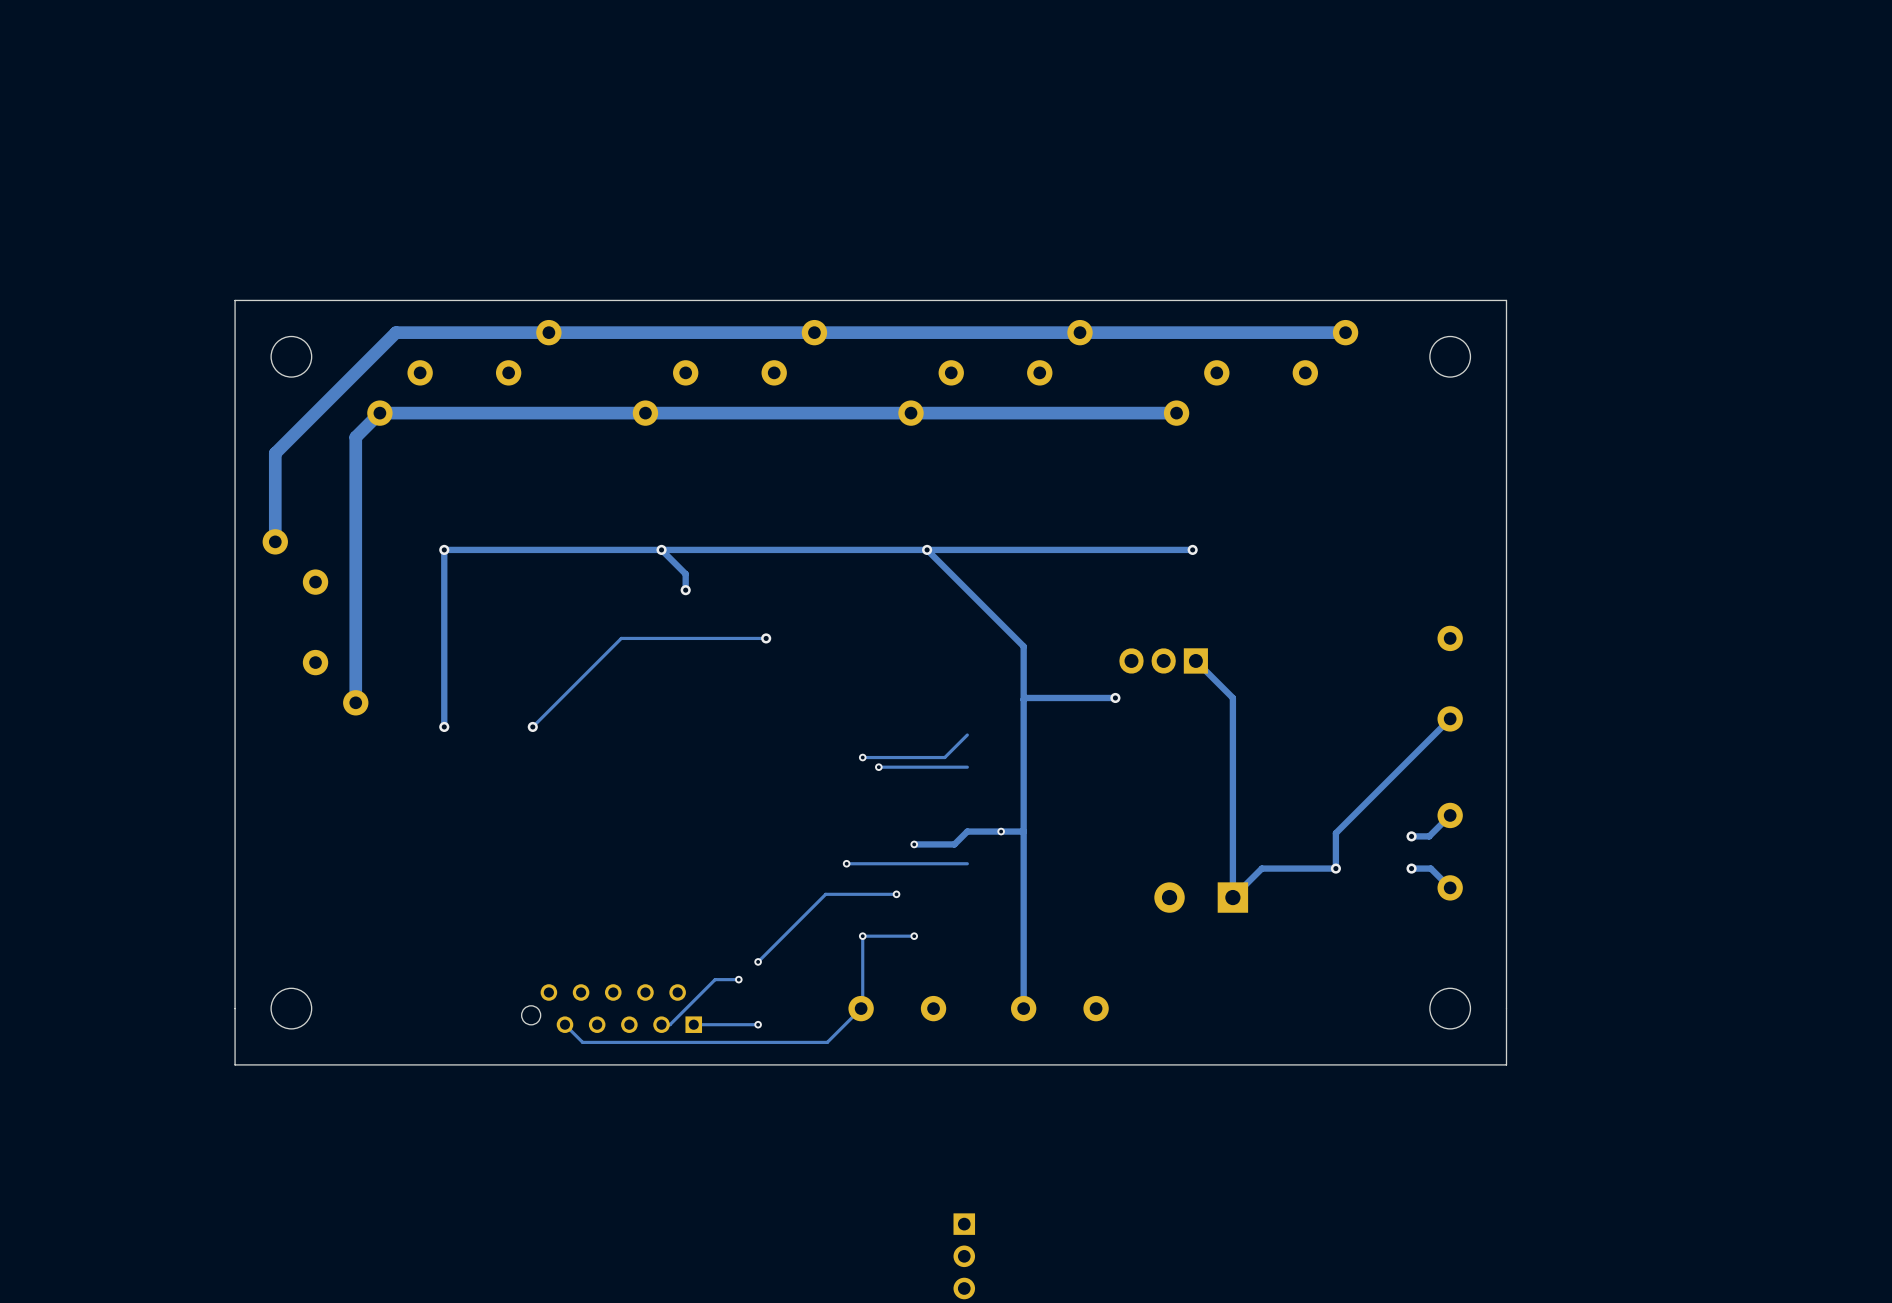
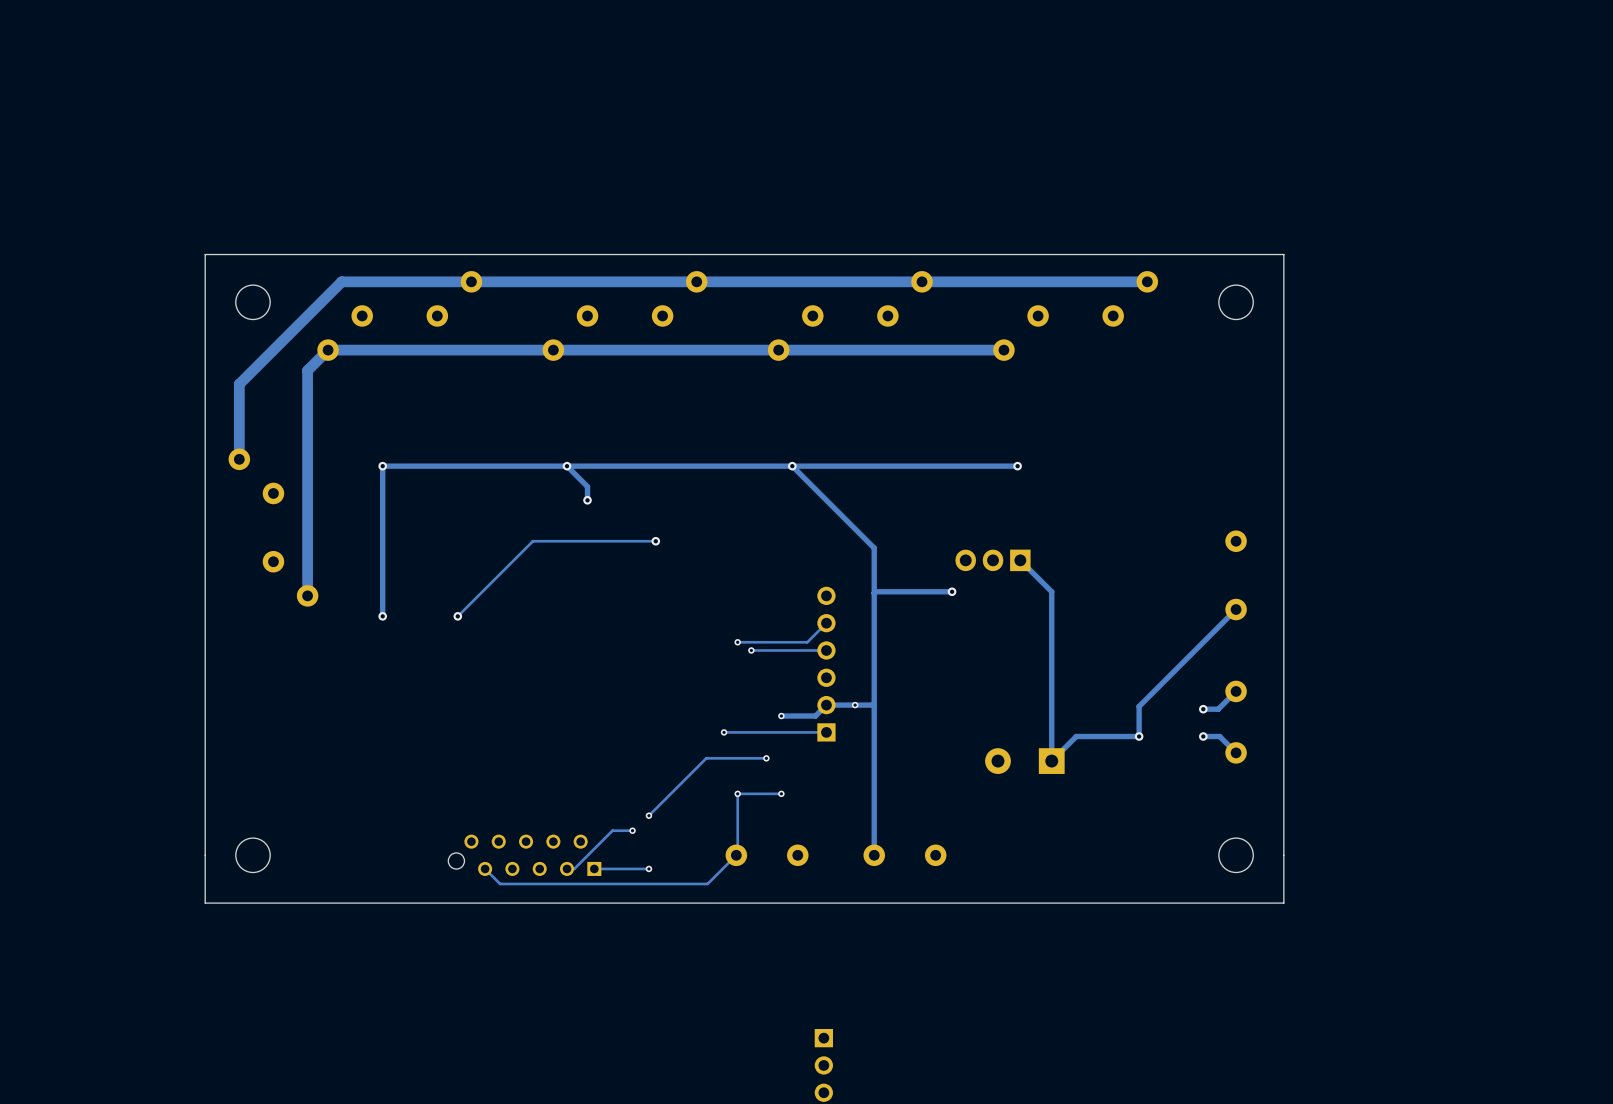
part: none -> (826, 664)

